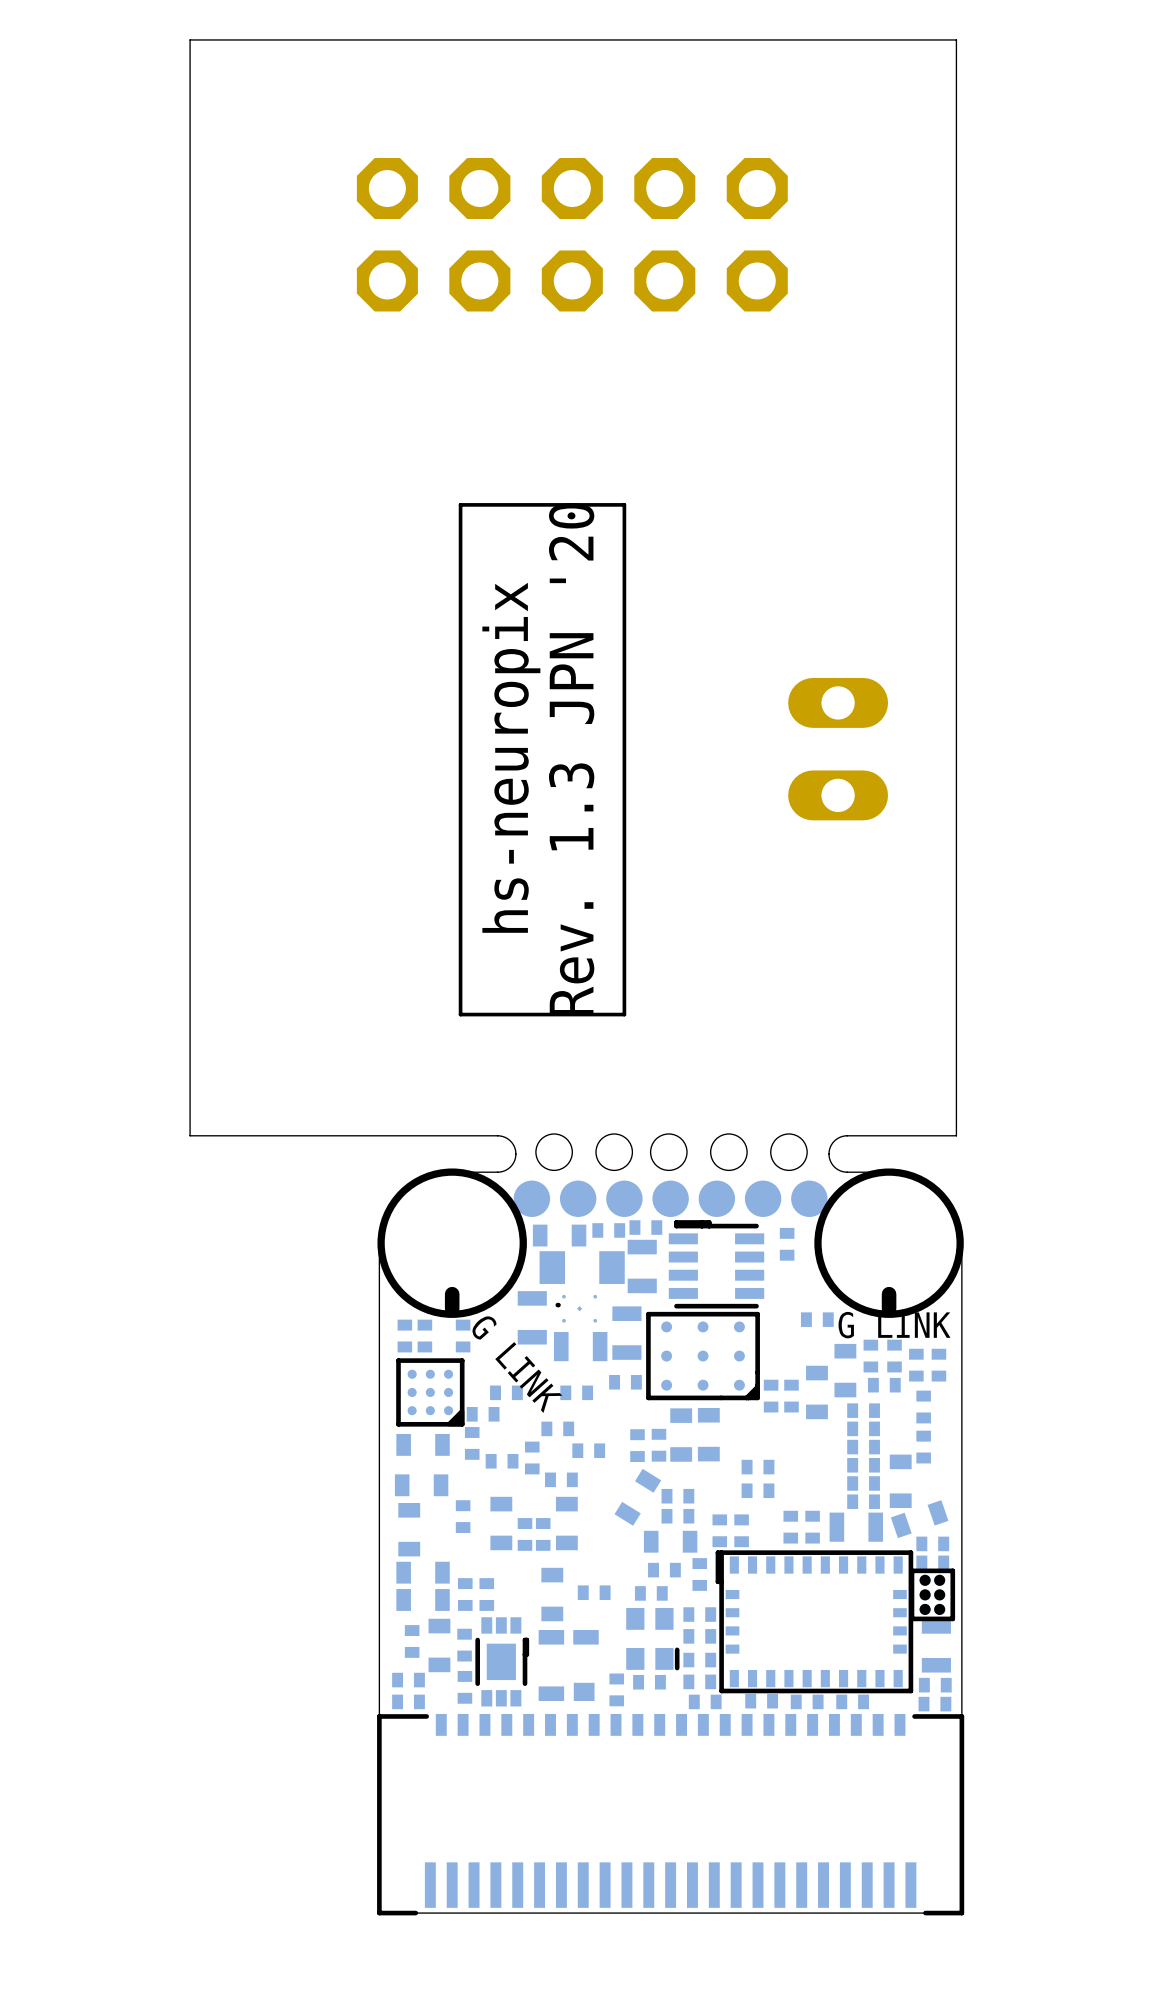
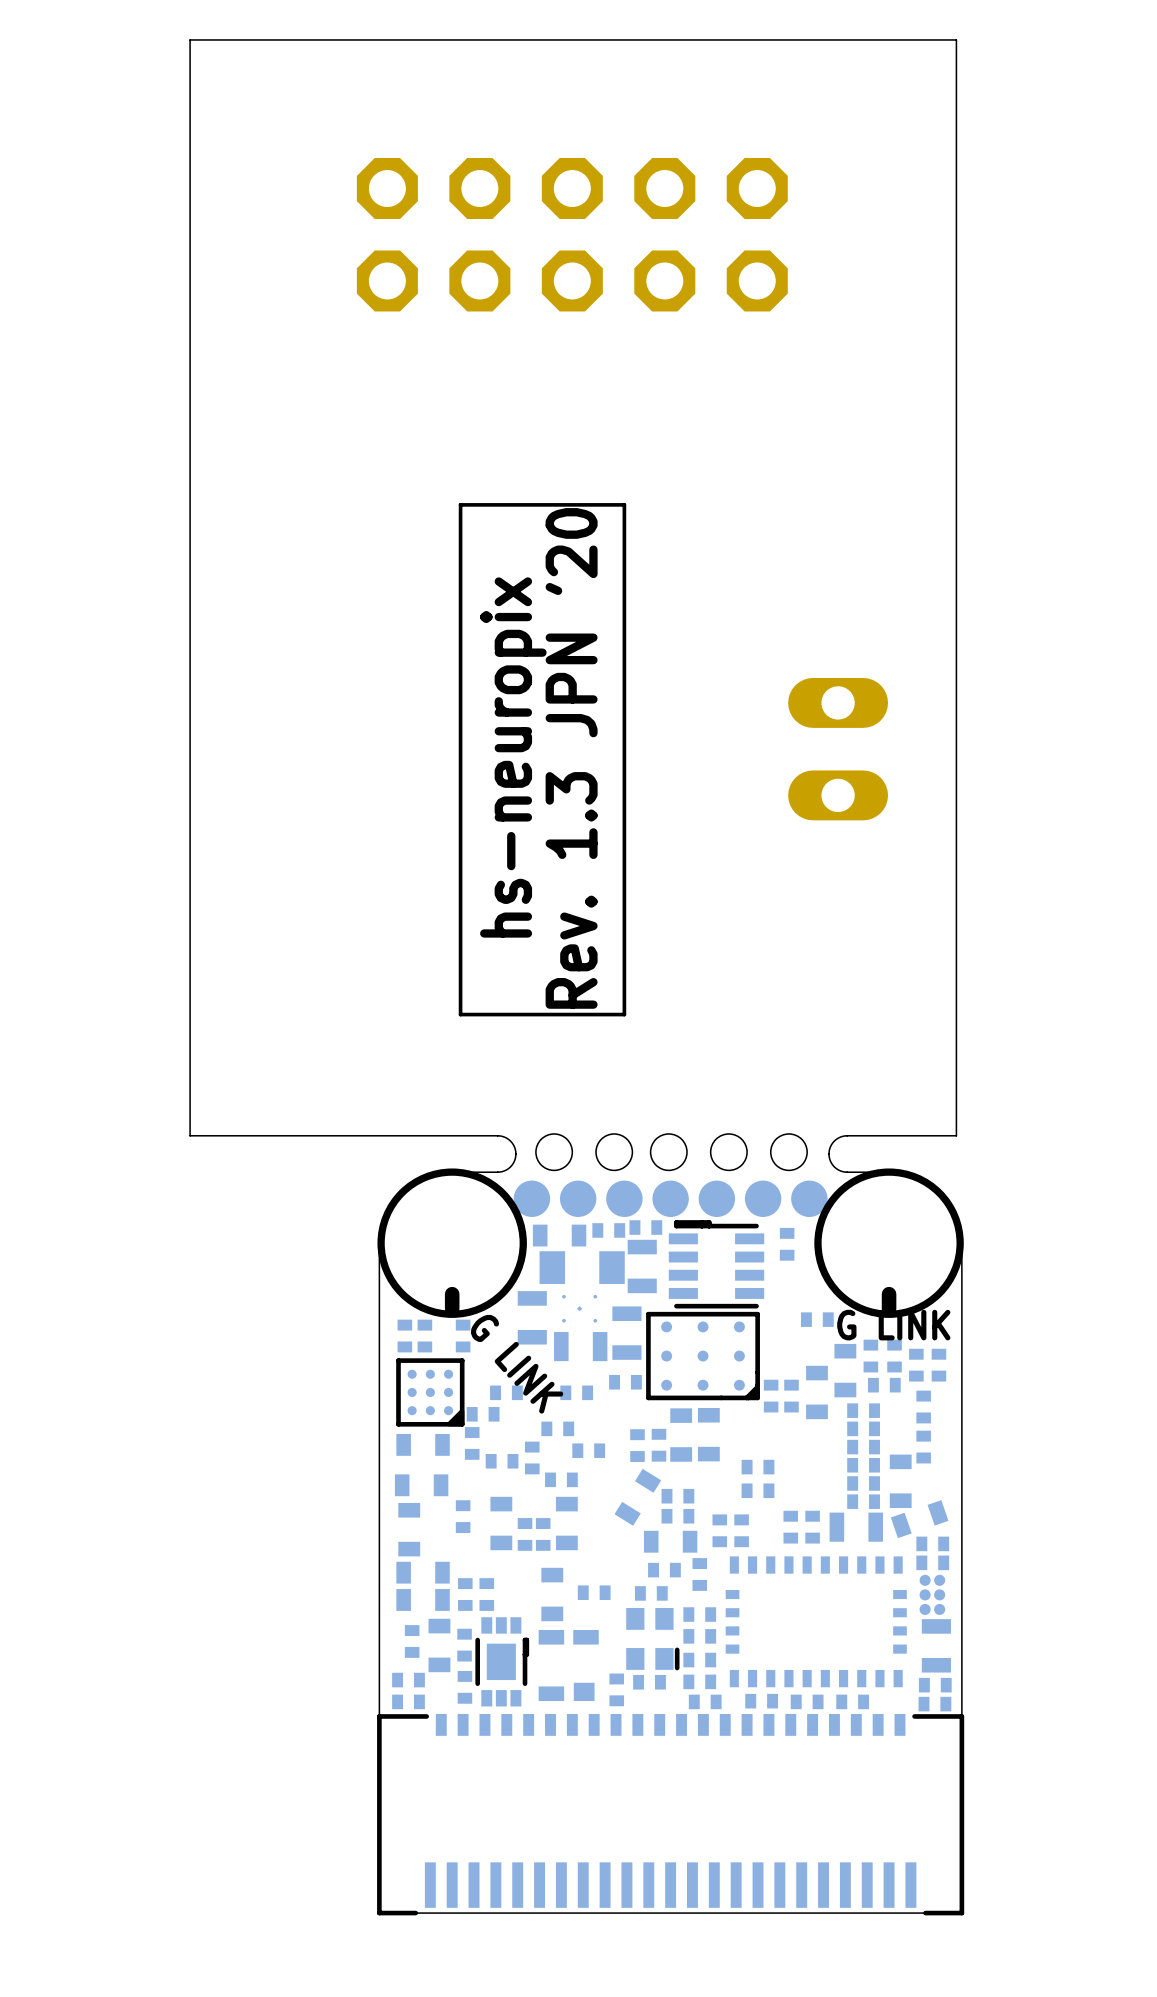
part footprint: [555, 1294, 598, 1323] -> [562, 1294, 598, 1323]
part footprint: [715, 1550, 914, 1694] -> [725, 1556, 907, 1688]
part footprint: [909, 1568, 956, 1622] -> [919, 1574, 946, 1615]

